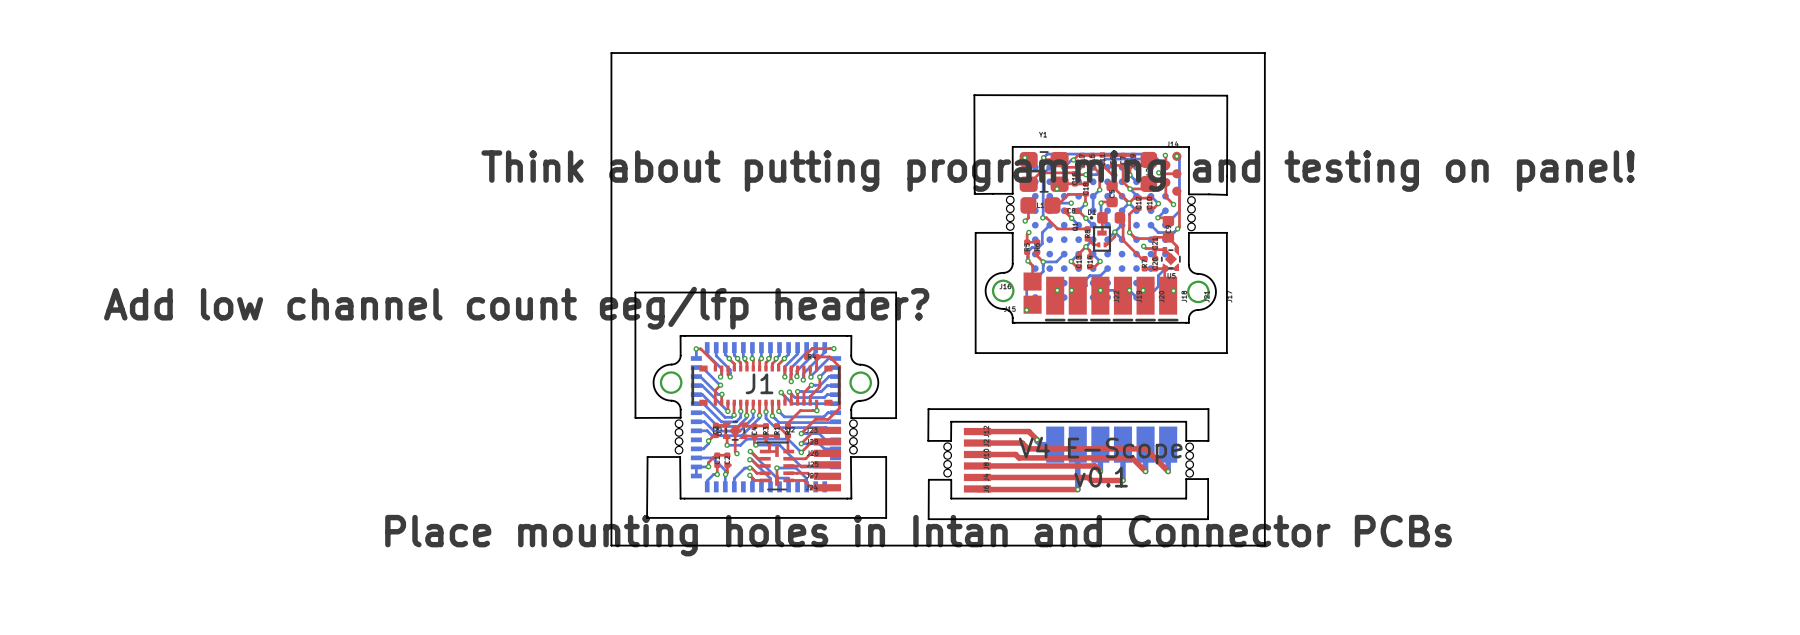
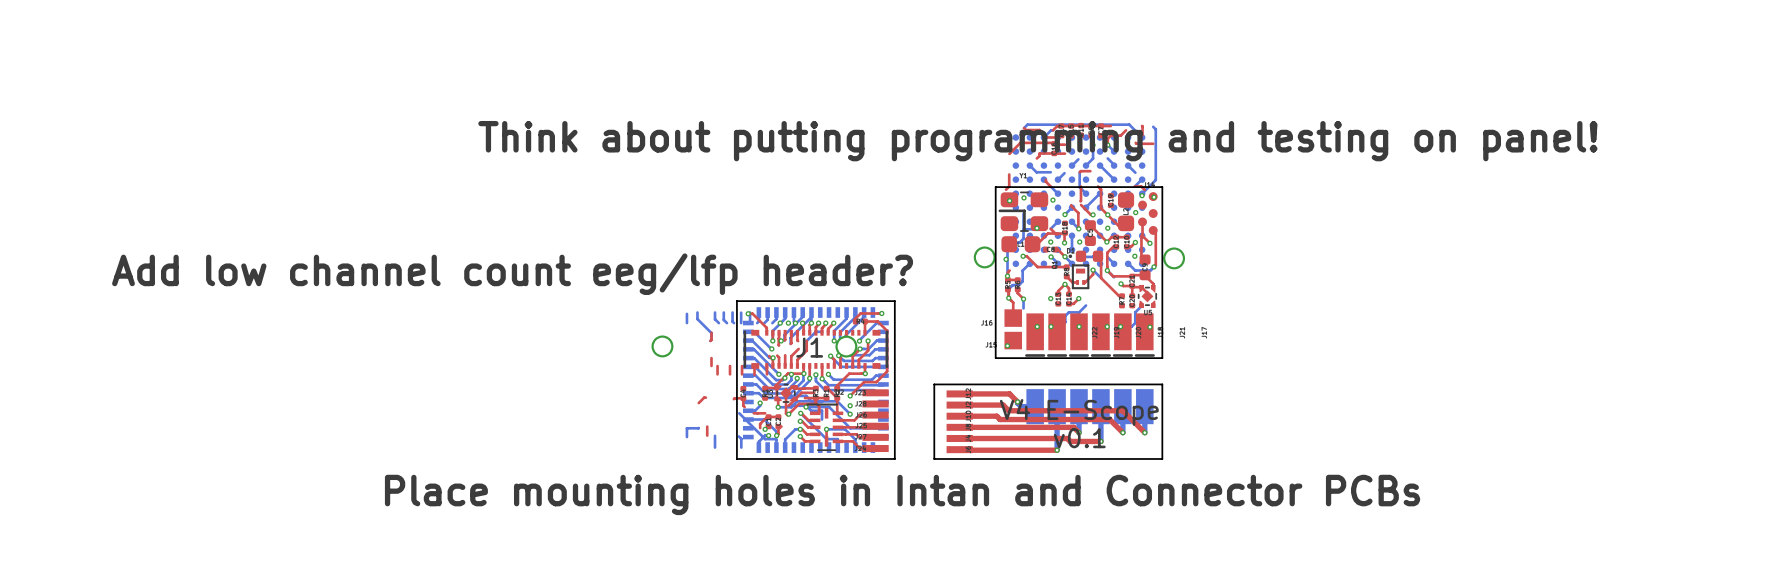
board edge: (611, 53) (611, 545) (1264, 545) (1264, 53) (611, 53) -> none
board edge: (974, 95) (1227, 95) (1226, 194) (1188, 194) (1188, 147) (1012, 146) (1012, 193) (974, 194) (974, 95) -> none
via: (1165, 155) -> none
via: (1176, 156) -> none
via: (1024, 157) -> none
via: (1043, 157) -> none
via: (1073, 160) -> none
part position: (1133, 160) -> (1110, 200)
top track: (1102, 164) (1114, 175) -> (1081, 204) (1093, 214)
top track: (1092, 165) (1099, 173) (1099, 189) -> none
top track: (1113, 165) (1123, 165) (1123, 182) (1130, 188) (1143, 188) (1148, 183) -> none
bottom track: (1049, 167) (1043, 173) (1042, 217) -> none
bottom track: (1150, 167) (1142, 159) (1105, 159) (1100, 163) (1100, 170) (1096, 174) (1085, 174) -> none
part position: (1043, 171) -> (1023, 211)
part position: (1148, 171) -> (1126, 211)
via: (1158, 172) -> none
part position: (1171, 173) -> (1147, 213)
via: (1085, 174) -> none
top track: (1165, 182) (1165, 196) (1173, 204) -> (1142, 221) (1142, 235) (1149, 243)
top track: (1112, 185) (1129, 202) -> (1090, 225) (1106, 241)
via: (1057, 188) -> none
part position: (1085, 188) -> (1064, 228)
via: (1130, 188) -> none
via: (1099, 189) -> none
top track: (1176, 191) (1179, 193) (1179, 227) (1177, 228) -> (1153, 230) (1155, 232) (1155, 265) (1154, 266)
top track: (1085, 193) (1068, 194) (1057, 205) (1052, 205) -> (1064, 233) (1047, 233) (1037, 244) (1032, 244)
part position: (1112, 193) -> (1090, 233)
top track: (1085, 194) (1085, 204) -> (1064, 233) (1064, 242)
round board edge: [1006, 196, 1015, 204] -> none
bottom track: (1093, 196) (1093, 210) -> (1072, 235) (1072, 249)
round board edge: [1187, 196, 1196, 205] -> none
top track: (1149, 198) (1134, 198) (1129, 203) -> (1126, 237) (1111, 237) (1106, 242)
via: (1071, 203) -> none
via: (1101, 203) -> none
bottom track: (1129, 203) (1122, 210) -> none
via: (1129, 203) -> none
part position: (1138, 203) -> (1116, 242)
part position: (1149, 203) -> (1126, 242)
top track: (1158, 203) (1153, 208) (1149, 208) -> (1135, 242) (1131, 246) (1126, 246)
via: (1158, 203) -> none
round board edge: [1006, 204, 1015, 213] -> none
via: (1085, 204) -> none
via: (1173, 204) -> none
part position: (1040, 205) -> (1020, 244)
round board edge: [1187, 205, 1196, 214] -> none
top track: (1138, 208) (1135, 208) (1129, 214) (1129, 232) (1135, 238) (1168, 237) (1177, 246) (1177, 249) -> (1116, 246) (1113, 246) (1107, 252) (1107, 270) (1113, 276) (1144, 275) (1153, 283) (1153, 287)
part position: (1071, 210) -> (1050, 249)
top track: (1076, 210) (1085, 218) -> (1055, 249) (1064, 256)
round board edge: [1006, 213, 1015, 222] -> none
round board edge: [1187, 214, 1196, 223] -> none
top track: (1042, 217) (1046, 217) (1057, 228) (1087, 228) -> (1023, 256) (1026, 256) (1037, 267) (1066, 267)
via: (1042, 217) -> none
part position: (1107, 217) -> (1085, 256)
via: (1157, 217) -> none
via: (1071, 218) -> none
bottom track: (1085, 218) (1092, 225) -> (1064, 256) (1071, 263)
via: (1085, 218) -> none
via: (1025, 221) -> none
round board edge: [1006, 222, 1015, 231] -> none
round board edge: [1187, 223, 1196, 231] -> none
bottom track: (1049, 225) (1042, 232) (1042, 243) (1038, 247) (1032, 247) (1027, 251) (1027, 260) -> (1029, 263) (1022, 270) (1022, 281) (1018, 285) (1012, 285) (1008, 289) (1008, 298)
bottom track: (1150, 225) (1158, 232) (1173, 232) (1177, 228) -> (1128, 263) (1135, 270) (1150, 270) (1154, 266)
via: none -> (1142, 195)
via: none -> (1024, 197)
part position: (1168, 229) -> (1145, 267)
via: none -> (1052, 200)
board edge: (975, 232) (975, 353) (1226, 353) (1226, 232) (1188, 232) (1189, 268) (1193, 272) (1204, 275) (1210, 279) (1215, 291) (1213, 300) (1208, 306) (1190, 313) (1188, 322) (1012, 322) (1010, 312) (992, 305) (986, 297) (985, 290) (990, 278) (996, 274) (1008, 271) (1012, 267) (1012, 232) (975, 232) -> (995, 187) (995, 358) (1162, 358) (1162, 187) (995, 187)
top track: (1028, 232) (1027, 242) (1037, 242) -> (1009, 270) (1007, 279) (1017, 279)
bottom track: (1114, 232) (1122, 239) -> (1093, 270) (1100, 277)
top track: (1114, 232) (1114, 236) (1105, 244) -> (1093, 270) (1093, 274) (1083, 282)
via: (1114, 232) -> none
via: (1129, 232) -> none
part position: (1087, 233) -> (1066, 271)
top track: (1087, 238) (1093, 244) (1098, 244) -> (1066, 276) (1072, 282) (1077, 282)
part position: (1101, 238) -> (1080, 276)
part position: (1155, 243) -> (1132, 281)
via: none -> (1135, 212)
top track: (1143, 246) (1145, 248) (1164, 249) (1170, 255) (1170, 259) -> (1121, 283) (1123, 286) (1141, 287) (1147, 293) (1147, 296)
via: (1143, 246) -> none
part position: (1027, 247) -> (1007, 284)
part position: (1037, 247) -> (1017, 284)
via: none -> (1093, 214)
via: none -> (1107, 214)
top track: (1155, 248) (1155, 258) -> (1132, 286) (1132, 296)
top track: (1037, 252) (1037, 255) (1043, 261) -> (1017, 289) (1017, 293) (1023, 299)
top track: (1027, 253) (1027, 260) (1032, 265) (1032, 281) -> (1007, 290) (1008, 298) (1013, 302) (1013, 318)
top track: (1079, 256) (1079, 253) (1085, 246) (1090, 250) (1090, 256) -> (1058, 294) (1058, 291) (1064, 284) (1069, 288) (1069, 294)
part position: (1170, 259) -> (1147, 296)
via: (1027, 260) -> none
via: none -> (1036, 228)
via: none -> (1107, 228)
via: (1043, 261) -> none
via: (1071, 261) -> none
part position: (1079, 261) -> (1058, 299)
part position: (1090, 261) -> (1069, 299)
top track: (1100, 261) (1094, 266) (1090, 266) -> (1078, 229) (1078, 213) (1071, 205)
part position: (1144, 263) -> (1122, 300)
part position: (1155, 263) -> (1132, 300)
bottom track: (1107, 268) (1100, 275) (1089, 275) (1086, 279) (1086, 285) (1081, 290) (1071, 290) -> (1057, 263) (1051, 256)
bottom track: (1165, 268) (1158, 275) (1158, 286) (1154, 290) (1143, 290) -> (1142, 305) (1135, 312) (1135, 322) (1131, 326) (1120, 326)
via: none -> (1050, 242)
via: none -> (1064, 242)
via: none -> (1079, 242)
via: none -> (1106, 242)
via: none -> (1135, 242)
via: none -> (1149, 243)
part position: (1032, 281) -> (1013, 318)
via: none -> (1023, 256)
top track: none -> (1098, 256) (1101, 259) (1101, 278) (1119, 296) (1122, 296)
via: none -> (1134, 256)
via: (1057, 290) -> none
via: none -> (1064, 256)
via: (1100, 290) -> none
via: (1129, 290) -> none
via: (1143, 290) -> none
via: (1173, 290) -> none
via: none -> (1006, 259)
part position: (1055, 299) -> (1035, 335)
part position: (1077, 299) -> (1057, 335)
part position: (1100, 299) -> (1079, 335)
part position: (1122, 299) -> (1100, 335)
part position: (1145, 299) -> (1122, 335)
part position: (1168, 299) -> (1144, 335)
via: none -> (1154, 266)
via: none -> (1093, 270)
part position: (1032, 304) -> (1013, 340)
via: none -> (1107, 270)
via: none -> (1064, 284)
via: none -> (1121, 283)
via: none -> (1008, 298)
bottom track: none -> (1023, 299) (1023, 308)
via: none -> (1023, 299)
via: none -> (1050, 298)
top track: none -> (1078, 298) (1073, 303) (1069, 303)
via: none -> (1078, 298)
board edge: (747, 335) (680, 335) (679, 360) (675, 363) (660, 368) (654, 375) (653, 382) (654, 389) (660, 396) (678, 404) (680, 417) (635, 417) (635, 292) (896, 292) (896, 418) (851, 418) (853, 404) (871, 397) (876, 389) (878, 382) (876, 375) (871, 368) (856, 363) (852, 360) (851, 335) -> (736, 301) (736, 458)
bottom track: none -> (1086, 305) (1079, 312) (1068, 312) (1065, 315) (1065, 322) (1060, 326) (1051, 326)
bottom track: (716, 347) (716, 355) (730, 369) (730, 376) -> none
bottom track: none -> (846, 312) (846, 318) (834, 331) (834, 340)
bottom track: none -> (855, 312) (855, 317) (840, 332) (840, 345)
bottom track: none -> (864, 312) (864, 316) (845, 335) (845, 340)
top track: (696, 348) (700, 348) (715, 363) (715, 368) -> none
via: (696, 348) -> none
via: none -> (748, 313)
top track: (833, 348) (812, 348) (806, 353) (806, 356) -> (881, 313) (860, 313) (855, 318) (855, 321)
via: (833, 348) -> none
via: none -> (881, 313)
bottom track: (806, 352) (790, 368) (791, 381) -> (793, 317) (795, 323)
part position: (811, 356) -> (860, 321)
top track: (816, 356) (829, 356) (839, 366) (839, 408) (828, 419) (815, 419) (801, 433) -> (865, 321) (877, 321) (887, 330) (887, 371) (876, 382) (863, 382) (850, 395)
top track: none -> (865, 322) (865, 332)
top track: (729, 358) (734, 364) (734, 368) -> none
via: (729, 358) -> none
top track: (737, 358) (740, 362) (740, 368) -> none
via: (737, 358) -> none
top track: (744, 358) (746, 368) -> none
via: (744, 358) -> none
top track: (752, 358) (753, 368) -> none
via: (752, 358) -> none
top track: (761, 358) (759, 368) -> (811, 323) (809, 332)
via: (761, 358) -> none
top track: (768, 358) (765, 362) (765, 368) -> (818, 323) (815, 327) (815, 332)
via: (768, 358) -> none
top track: (776, 358) (772, 363) (772, 368) -> (825, 323) (822, 328) (822, 332)
via: (776, 358) -> none
top track: (784, 358) (778, 364) -> (748, 313) (752, 313) (766, 328)
via: (784, 358) -> none
via: none -> (780, 323)
via: none -> (788, 323)
via: none -> (795, 323)
via: none -> (802, 323)
via: none -> (811, 323)
via: none -> (818, 323)
bottom track: (835, 358) (828, 358) (810, 377) -> (883, 323) (876, 323) (859, 341)
via: none -> (825, 323)
top track: none -> (833, 323) (828, 328) (828, 332)
via: none -> (833, 323)
via: none -> (1037, 326)
via: none -> (1051, 326)
via: none -> (1079, 326)
via: none -> (1107, 326)
via: none -> (1120, 326)
via: none -> (1149, 327)
bottom track: (696, 367) (702, 367) (720, 385) -> (748, 331) (754, 331) (771, 348)
top track: (728, 368) (728, 374) (730, 376) -> none
bottom track: (696, 376) (700, 376) (718, 394) (721, 394) -> (748, 340) (752, 340) (769, 357) (773, 357)
via: (720, 376) -> none
via: (730, 376) -> none
via: none -> (781, 340)
via: (796, 376) -> none
via: (819, 376) -> none
bottom track: (835, 376) (828, 376) (820, 385) (811, 385) -> (883, 340) (877, 340) (868, 348) (860, 348)
via: none -> (834, 340)
top track: none -> (868, 340) (868, 350) (858, 359) (858, 365)
via: none -> (868, 340)
via: (810, 377) -> none
via: none -> (859, 341)
via: (803, 379) -> none
via: (791, 381) -> none
via: none -> (1007, 345)
bottom track: (696, 385) (702, 385) (727, 411) -> (748, 349) (753, 349) (778, 374)
top track: (720, 385) (715, 390) (715, 402) -> none
via: (720, 385) -> none
J1 position: (765, 385) -> (815, 349)
via: none -> (771, 348)
via: (811, 385) -> none
bottom track: (835, 385) (827, 385) (821, 391) (797, 391) -> (883, 349) (875, 349) (869, 355) (846, 355)
top track: none -> (860, 348) (852, 356) (852, 365)
via: none -> (860, 348)
via: (797, 391) -> none
bottom track: (781, 392) (792, 403) (835, 403) -> (830, 356) (841, 366) (883, 366)
via: (781, 392) -> none
bottom track: (789, 392) (794, 397) (824, 397) (827, 394) (835, 394) -> (838, 355) (843, 360) (872, 360) (875, 358) (883, 358)
via: (789, 392) -> none
top track: none -> (830, 356) (834, 359) (834, 365)
via: none -> (830, 356)
top track: none -> (838, 355) (840, 365)
via: none -> (838, 355)
bottom track: (696, 394) (702, 394) (725, 417) (731, 417) (734, 415) -> (748, 358) (754, 358) (776, 380) (782, 380) (784, 378)
via: (721, 394) -> none
via: none -> (773, 357)
top track: (734, 402) (734, 415) -> none
top track: (746, 402) (746, 415) -> none
top track: (759, 402) (759, 415) -> (809, 365) (809, 378)
top track: (772, 402) (772, 415) -> (822, 366) (822, 378)
top track: none -> (865, 365) (865, 373) (849, 373) (837, 385) (837, 388)
bottom track: (696, 403) (703, 403) (721, 421) (736, 421) (740, 417) (740, 411) -> (748, 366) (755, 366) (772, 384) (786, 384) (791, 380) (791, 374)
via: none -> (865, 373)
via: (727, 411) -> none
via: (740, 411) -> none
bottom track: (753, 411) (753, 417) (739, 431) (713, 431) (704, 421) (696, 421) -> (803, 374) (803, 380) (790, 393) (765, 393) (756, 384) (748, 384)
via: (753, 411) -> none
bottom track: (766, 411) (766, 418) (775, 427) (825, 427) (829, 430) (835, 430) -> (815, 374) (815, 381) (824, 390) (874, 390) (877, 393) (883, 393)
via: (766, 411) -> none
bottom track: (778, 411) (784, 416) (823, 416) (828, 412) (835, 412) -> (828, 374) (833, 379) (872, 379) (876, 375) (883, 375)
via: (778, 411) -> none
via: none -> (778, 374)
via: none -> (791, 374)
via: none -> (815, 374)
via: none -> (828, 374)
bottom track: (696, 412) (704, 412) (717, 426) (738, 426) (746, 415) -> (748, 375) (755, 375) (769, 389) (788, 389) (797, 378)
via: (734, 415) -> none
via: (746, 415) -> none
bottom track: (759, 415) (759, 417) (741, 435) (712, 435) (707, 430) (696, 430) -> (809, 378) (809, 380) (792, 397) (763, 397) (758, 393) (748, 393)
via: (759, 415) -> none
bottom track: (772, 415) (779, 422) (835, 421) -> (822, 378) (828, 385) (883, 384)
via: (772, 415) -> none
via: none -> (784, 378)
via: none -> (797, 378)
via: none -> (809, 378)
via: none -> (822, 378)
part position: (765, 417) -> (815, 380)
round board edge: [675, 419, 683, 428] -> none
round board edge: [849, 419, 858, 428] -> none
board edge: (951, 421) (951, 440) (928, 440) (928, 409) (1208, 409) (1208, 440) (1186, 440) -> (934, 384) (934, 440)
top track: (715, 425) (725, 424) (727, 445) -> (767, 387) (776, 387) (778, 407)
top track: (754, 425) (765, 425) -> (804, 388) (815, 388)
top track: (776, 425) (787, 435) (788, 451) -> (826, 388) (837, 398) (837, 413)
top track: (754, 426) (741, 424) (735, 430) (735, 451) (736, 453) -> (804, 388) (792, 387) (786, 393) (786, 413) (787, 415)
round board edge: [675, 428, 683, 437] -> none
round board edge: [849, 428, 858, 437] -> none
part: (715, 430) -> none
part position: (735, 430) -> (786, 393)
part position: (765, 430) -> (815, 393)
part position: (787, 430) -> (837, 393)
part position: (827, 430) -> (875, 392)
part: none -> (826, 393)
via: (801, 433) -> none
via: none -> (850, 395)
top track: (754, 435) (776, 435) -> (804, 398) (826, 398)
top track: (765, 435) (765, 440) (769, 444) (769, 451) -> (815, 398) (819, 413)
round board edge: [675, 437, 683, 446] -> none
round board edge: [849, 437, 858, 446] -> none
bottom track: (708, 440) (708, 443) (703, 448) (696, 448) -> (760, 403) (755, 410) (748, 410)
via: (708, 440) -> none
via: none -> (760, 403)
part position: (827, 441) -> (875, 403)
round board edge: [943, 442, 952, 451] -> none
round board edge: [1185, 442, 1194, 451] -> none
via: (801, 443) -> none
via: none -> (850, 405)
bottom track: (727, 445) (740, 445) (746, 439) (788, 439) (801, 452) -> (778, 407) (791, 407) (797, 401) (837, 401) (850, 414)
via: (727, 445) -> none
bottom track: (755, 445) (779, 445) (801, 466) (835, 466) -> (806, 407) (829, 407) (850, 428) (883, 428)
via: (755, 445) -> none
via: none -> (778, 407)
via: none -> (806, 407)
round board edge: [675, 446, 683, 455] -> none
round board edge: [849, 446, 858, 455] -> none
top track: (750, 451) (758, 458) (765, 458) -> (800, 413) (808, 420) (815, 420)
via: (750, 451) -> none
bottom track: none -> (800, 413) (826, 439) (837, 439) (837, 447)
via: none -> (800, 413)
round board edge: [943, 451, 952, 460] -> none
round board edge: [1185, 451, 1194, 460] -> none
via: none -> (850, 414)
via: (736, 453) -> none
top track: (827, 453) (811, 453) (805, 458) (788, 458) -> (875, 415) (859, 415) (854, 420) (837, 420)
part position: (827, 453) -> (875, 415)
top track: (727, 455) (715, 455) (708, 462) (708, 466) -> (778, 416) (767, 416) (760, 424) (760, 428)
bottom track: (696, 457) (712, 457) (725, 470) (725, 474) -> (748, 419) (764, 419) (776, 431) (776, 435)
bottom track: (749, 459) (770, 478) (770, 480) -> (768, 435) (765, 435) (758, 441)
top track: (749, 459) (757, 465) (765, 465) -> none
via: (749, 459) -> none
via: none -> (800, 421)
part position: (717, 460) -> (768, 421)
part position: (727, 460) -> (778, 421)
round board edge: [943, 460, 952, 469] -> none
round board edge: [1185, 460, 1194, 469] -> none
part position: (827, 464) -> (875, 426)
top track: none -> (875, 426) (837, 427)
top track: (730, 465) (727, 465) (725, 474) -> (781, 426) (778, 426) (776, 435)
part position: (775, 465) -> (824, 427)
top track: (788, 465) (821, 465) -> (800, 421) (808, 427)
via: (708, 466) -> none
bottom track: (749, 468) (744, 468) (734, 478) (734, 486) -> (800, 429) (795, 429) (785, 439) (785, 447)
top track: (749, 468) (756, 473) (765, 473) -> (800, 429) (807, 434) (815, 434)
via: (749, 468) -> none
bottom track: (776, 468) (796, 468) (806, 478) (806, 486) -> (826, 429) (845, 429) (855, 439) (855, 447)
via: none -> (800, 429)
via: none -> (826, 429)
round board edge: [943, 469, 952, 477] -> none
round board edge: [1185, 469, 1194, 478] -> none
top track: (788, 473) (808, 473) (811, 476) (827, 476) -> (837, 434) (875, 437)
bottom track: (717, 474) (713, 474) (707, 480) (707, 486) -> none
via: (717, 474) -> none
via: (725, 474) -> none
via: none -> (768, 435)
via: none -> (776, 435)
top track: (749, 475) (754, 480) (765, 480) -> (800, 436) (805, 441) (815, 441)
via: (749, 475) -> none
via: none -> (800, 436)
part position: (827, 476) -> (875, 437)
board edge: (1186, 479) (1208, 479) (1208, 519) (928, 519) (928, 479) (951, 479) -> (1162, 440) (1162, 403)
top track: (788, 480) (804, 480) (811, 487) (827, 487) -> (837, 441) (852, 441) (859, 448) (875, 448)
part position: (827, 487) -> (875, 448)
board edge: (747, 498) (680, 498) (680, 457) (647, 457) (647, 517) (886, 517) (886, 457) (850, 457) (851, 498) -> (837, 301) (894, 301) (894, 458) (837, 458)

